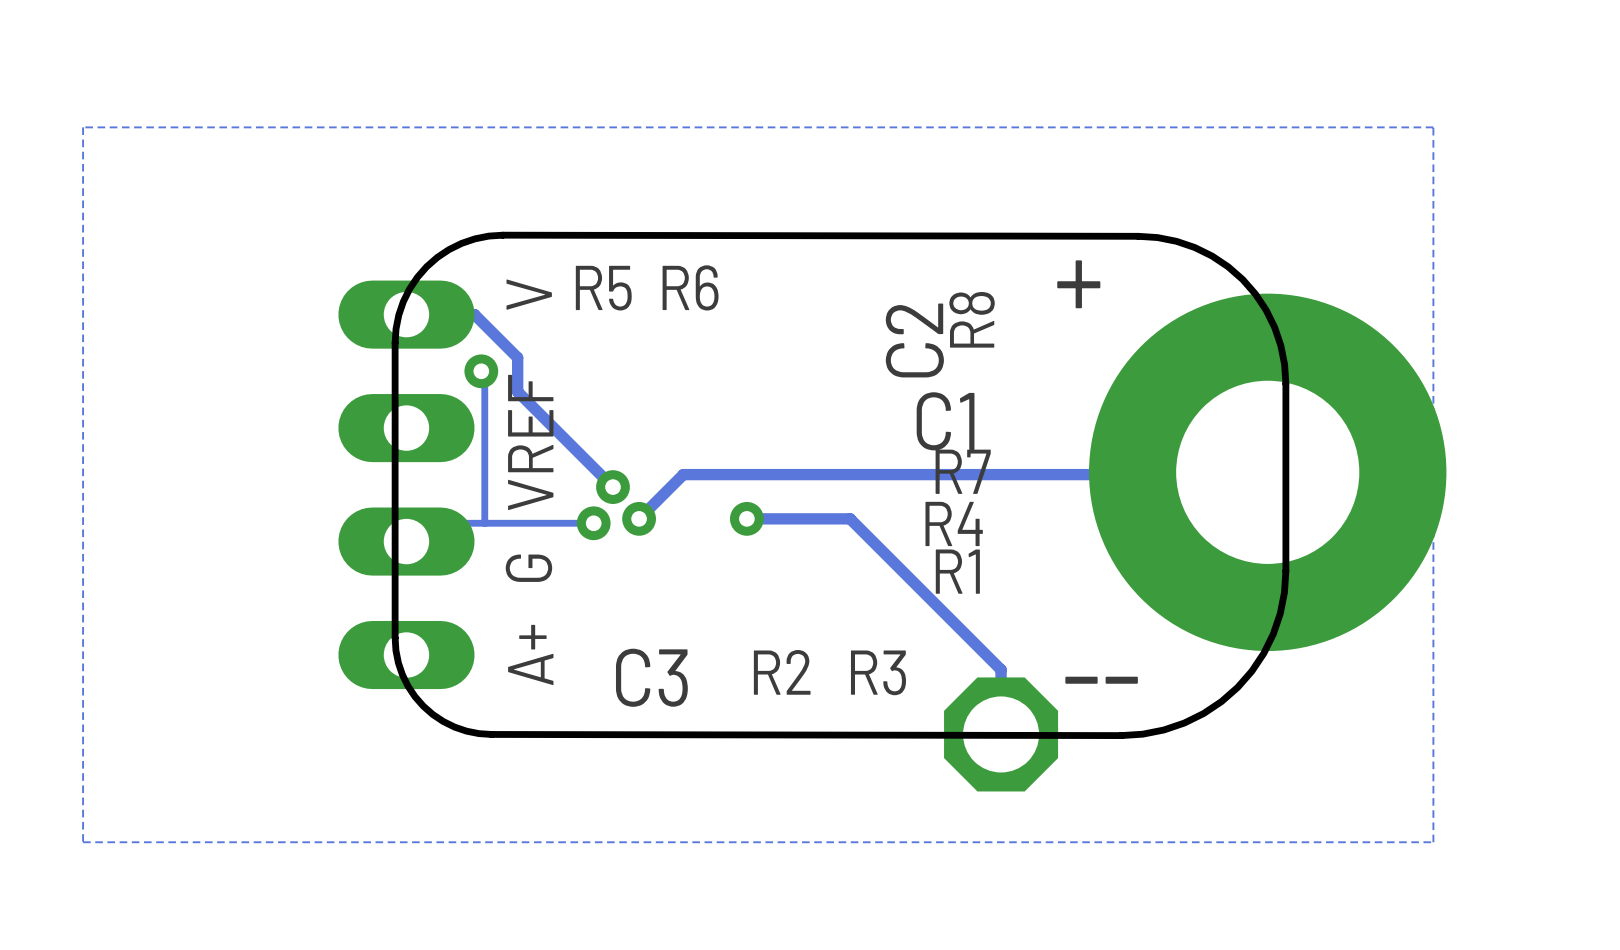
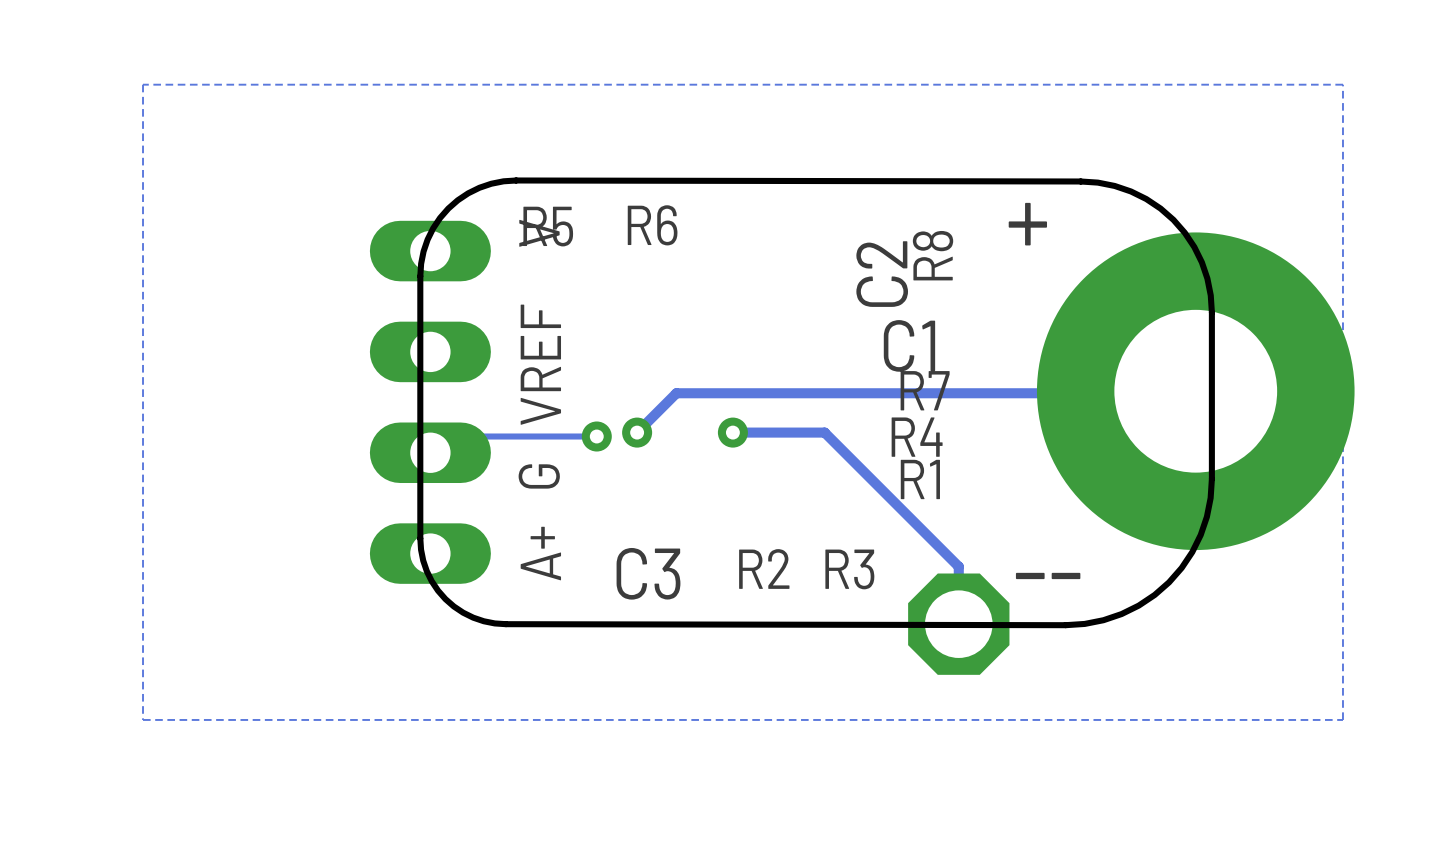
R6 position: (690, 287) -> (652, 225)
R5 position: (603, 288) -> (548, 226)
track: (406, 314) (474, 314) (517, 357) (517, 391) (612, 487) -> none
track: (481, 371) (484, 371) (484, 523) -> none
via: (481, 371) -> none
via: (612, 487) -> none

